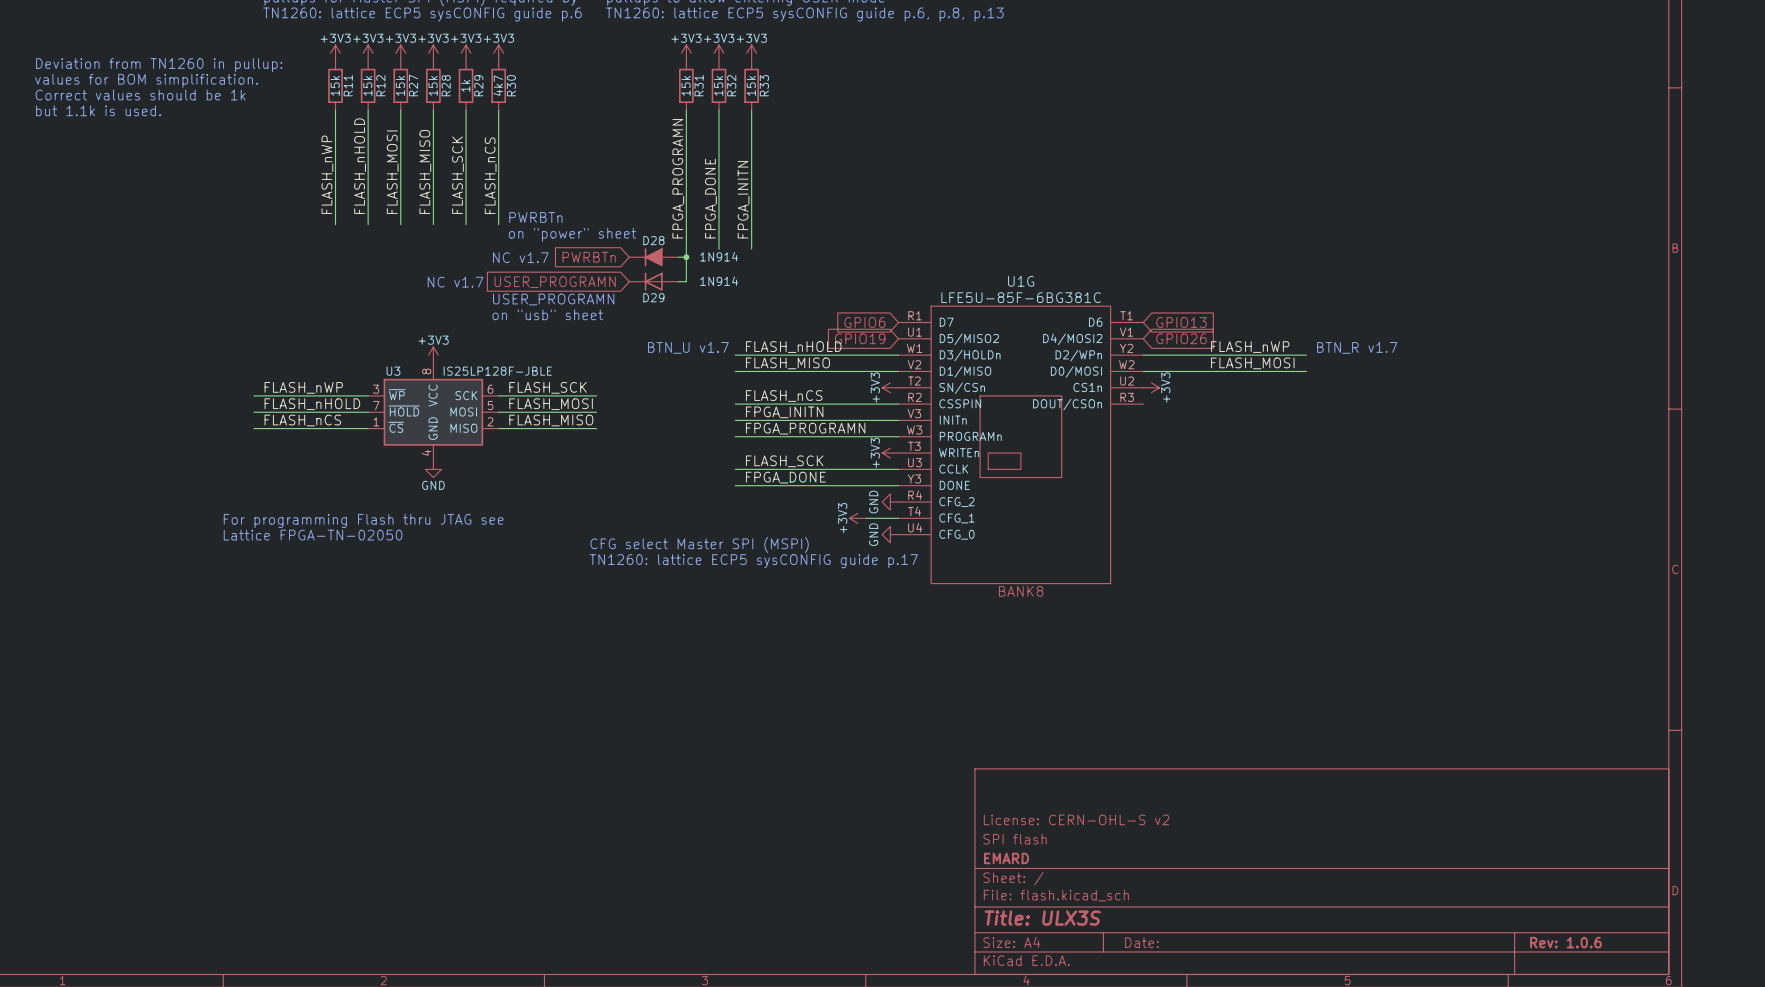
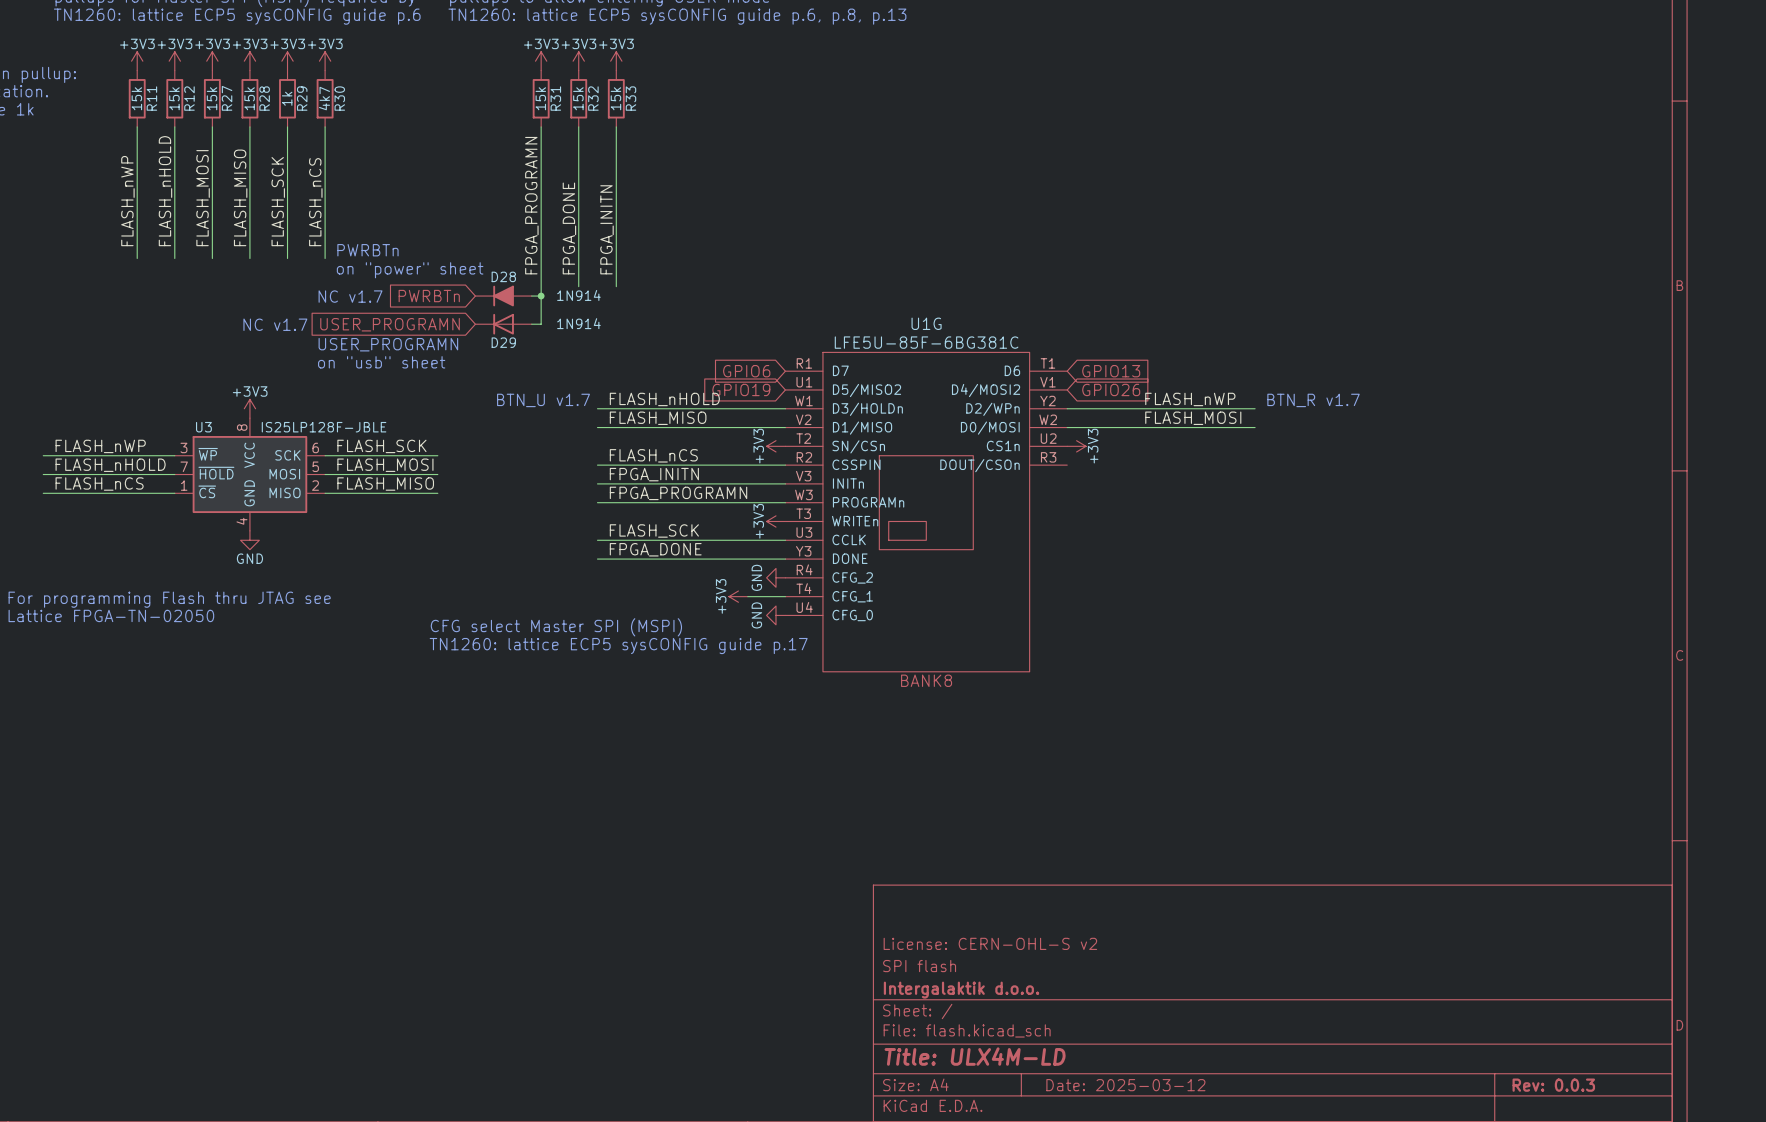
title block: EMARD (1006, 858) -> Intergalaktik d.o.o. (961, 990)
title block: Title: ULX3S (1042, 918) -> Title: ULX4M-LD (975, 1056)
title block: Date: (1141, 942) -> Date: 2025-03-12 (1125, 1085)
title block: Rev: 1.0.6 (1565, 942) -> Rev: 0.0.3 (1553, 1085)

